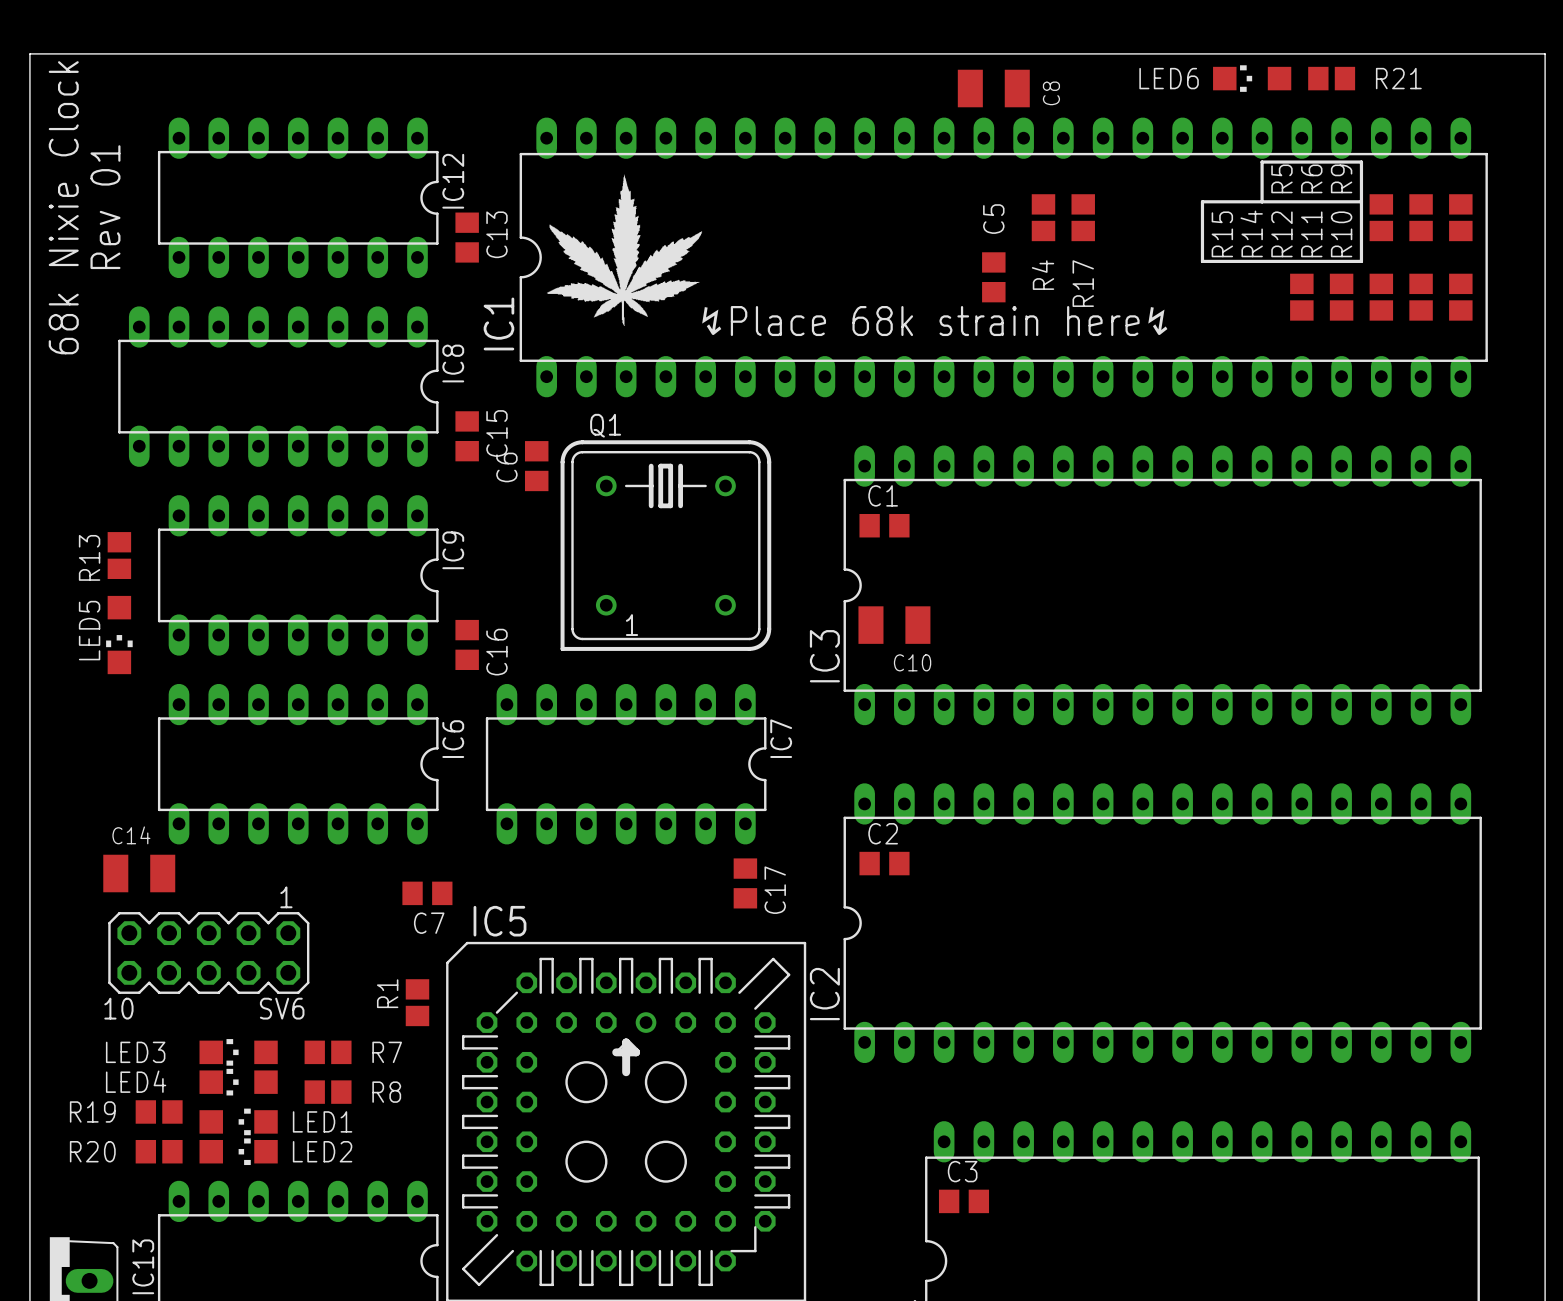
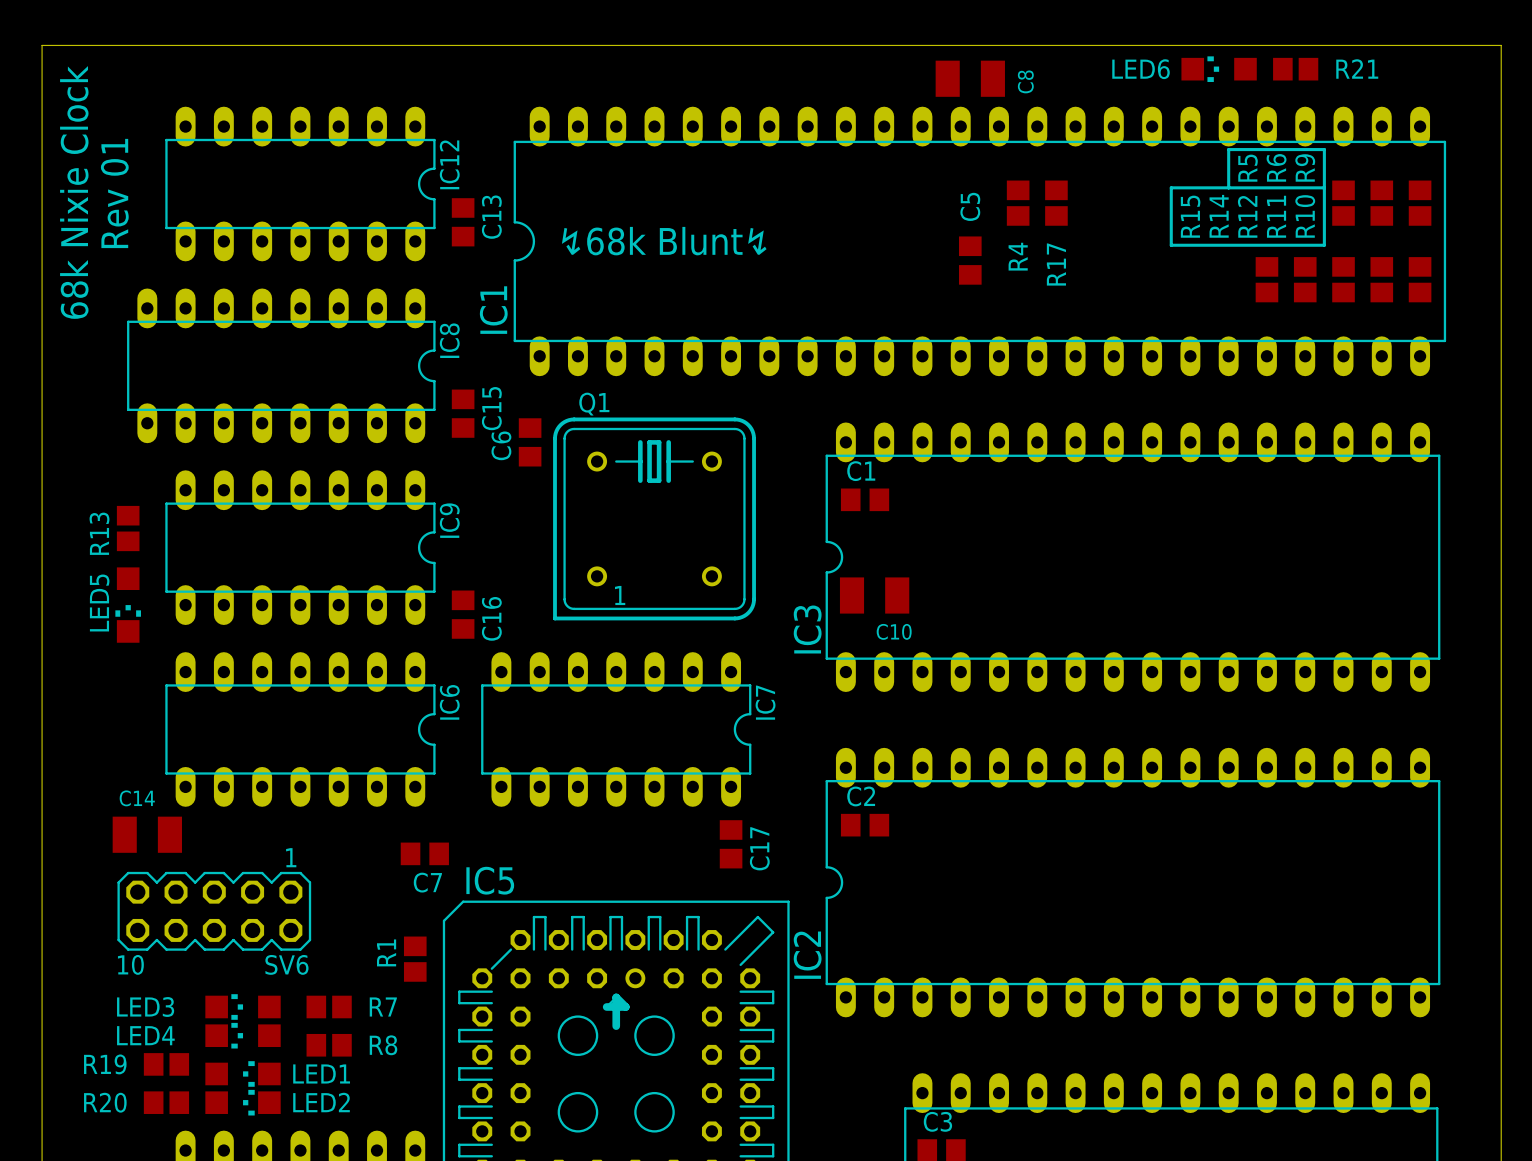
drawing: [546, 174, 703, 326] -> none
text: none -> ↯68k Blunt↯ (664, 241)
text: ↯Place 68k strain here↯ (934, 321) -> none

